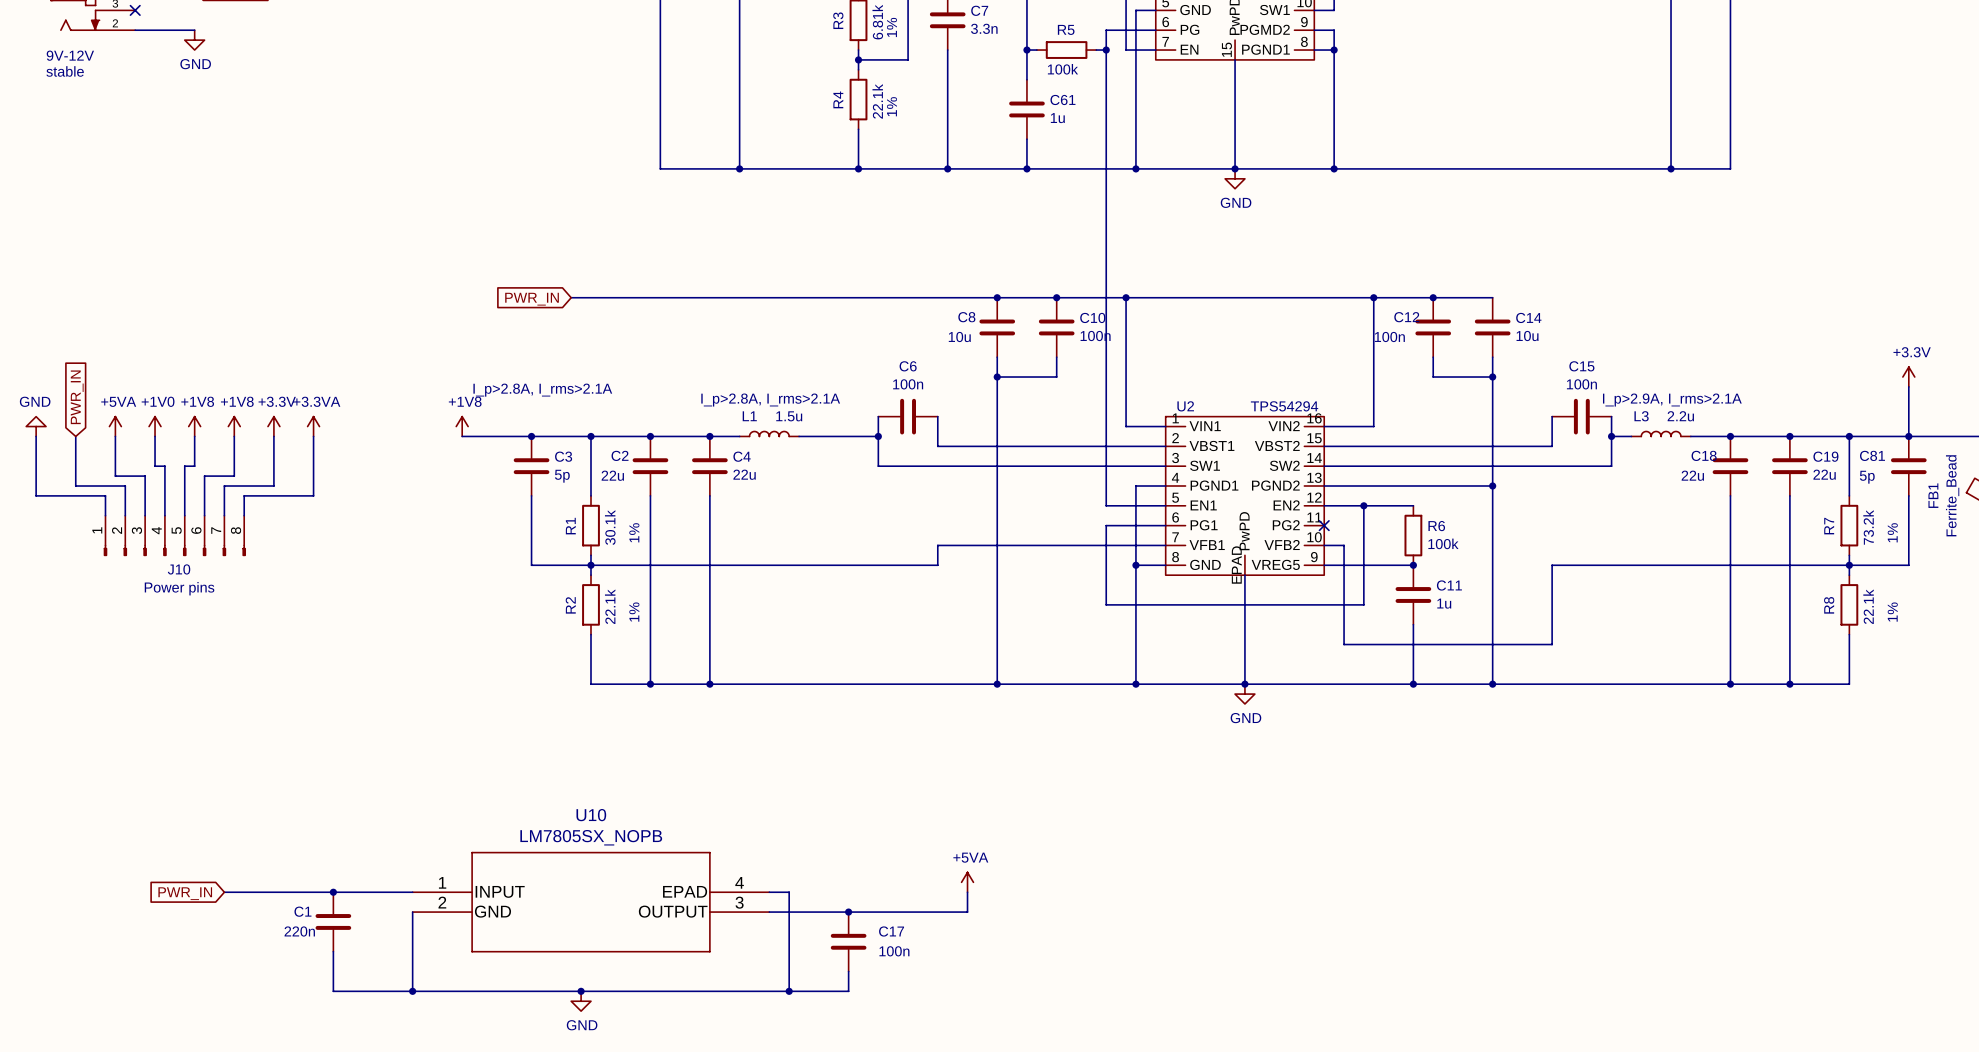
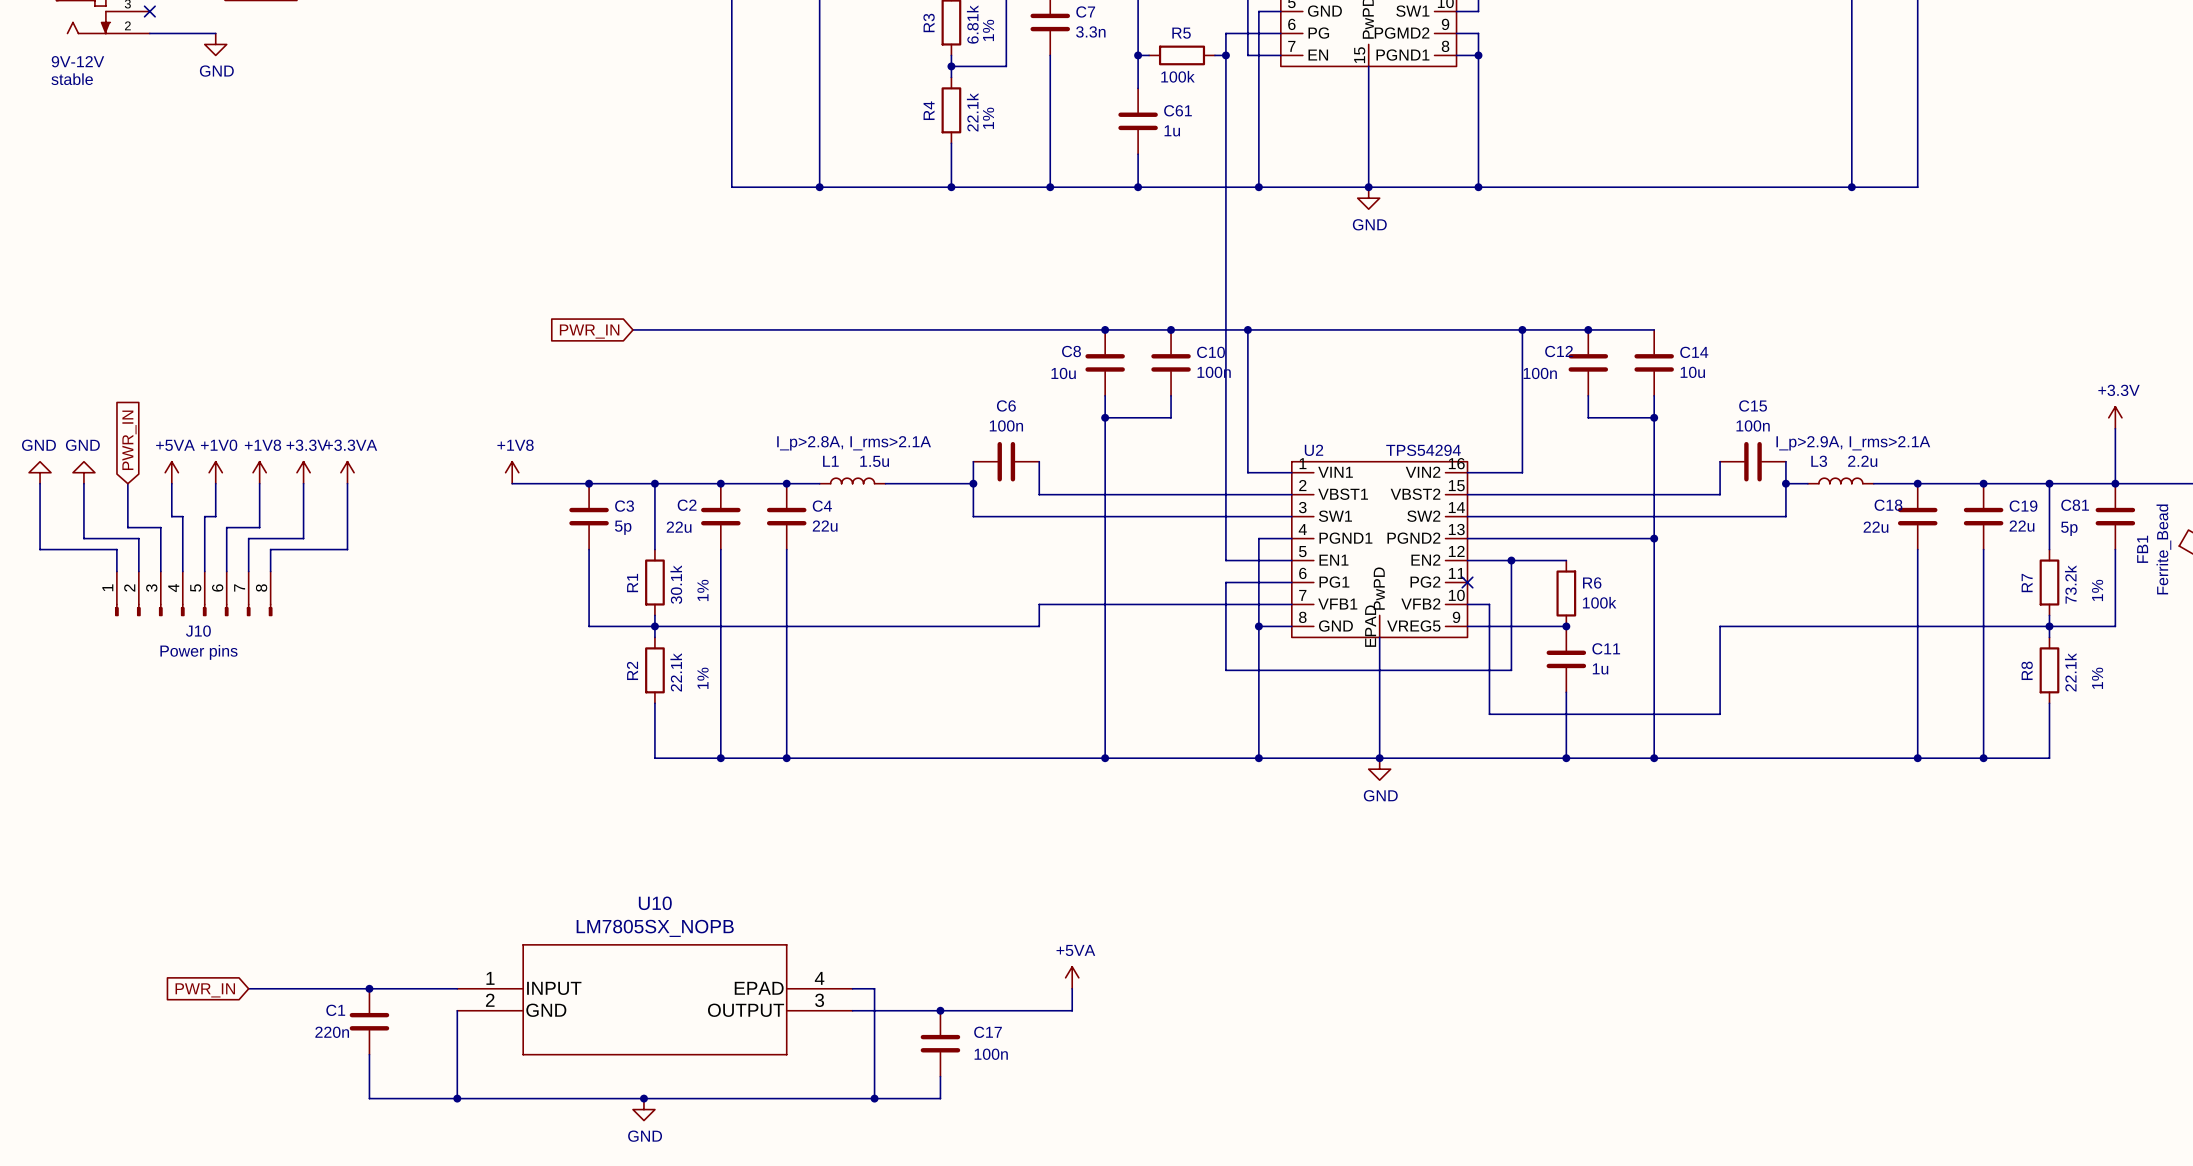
text: I_p>2.8A, I_rms>2.1A (542, 390) -> none
global label position: PWR_IN (77, 397) -> PWR_IN (129, 440)
power symbol: none -> GND (83, 472)
power symbol: +5VA (115, 426) -> none
power symbol: +1V0 (155, 426) -> +5VA (171, 472)
power symbol: +1V8 (194, 426) -> +1V0 (215, 472)

